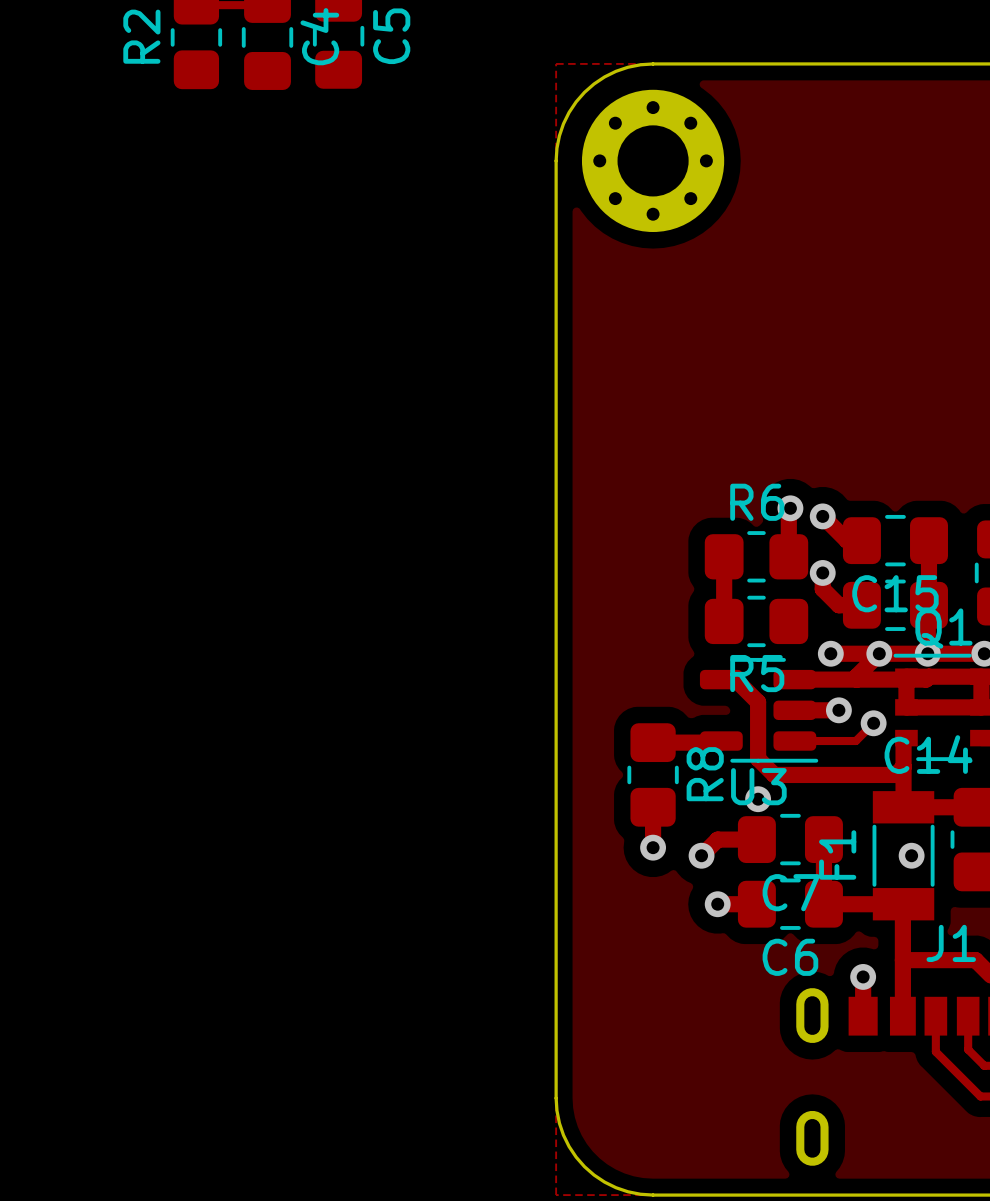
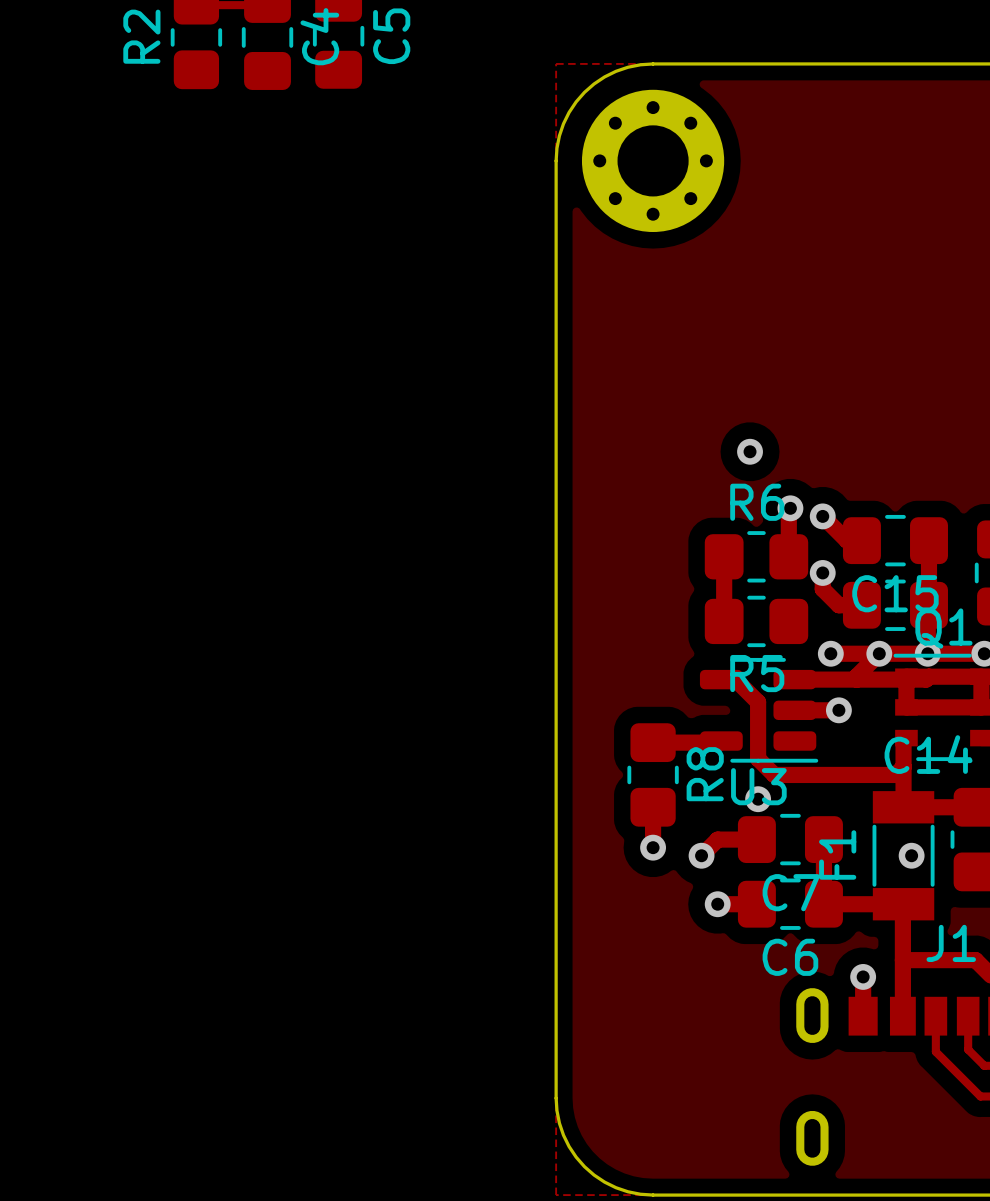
via: none -> (750, 451)
track: (873, 723) (855, 741) (794, 741) -> none
via: (873, 723) -> none

